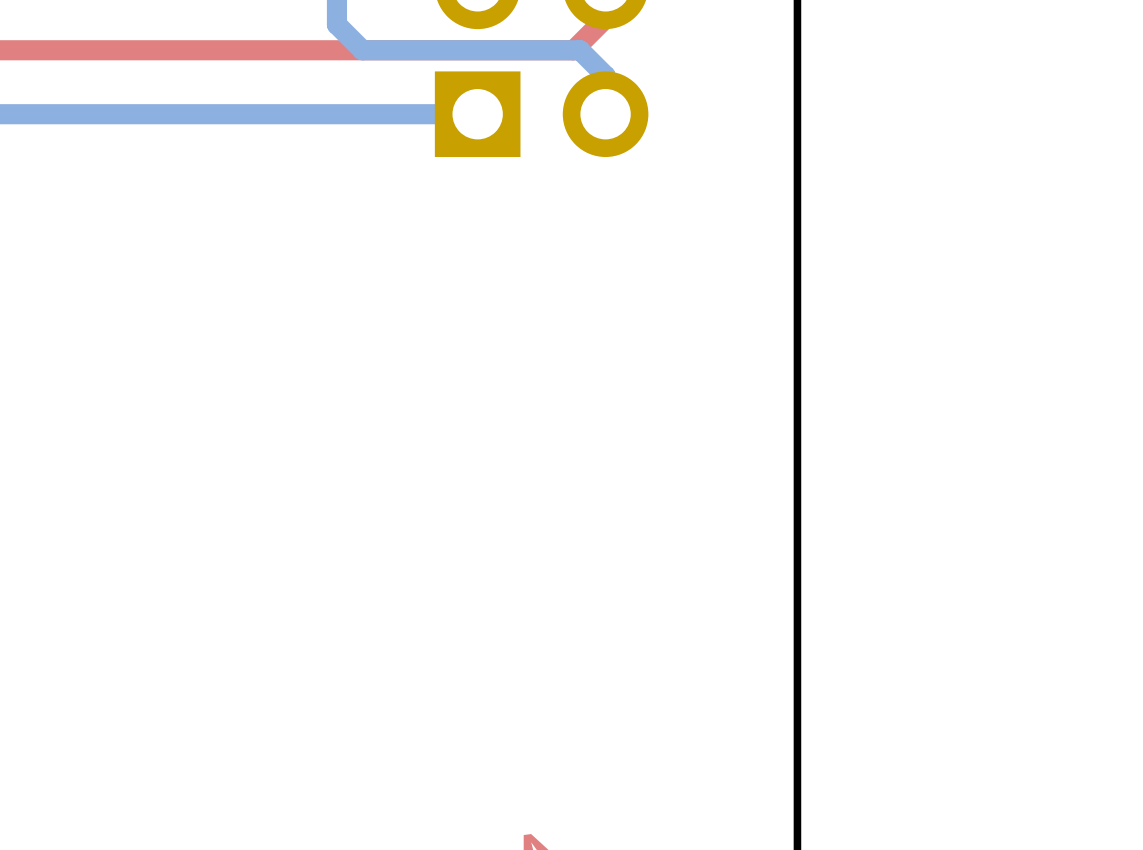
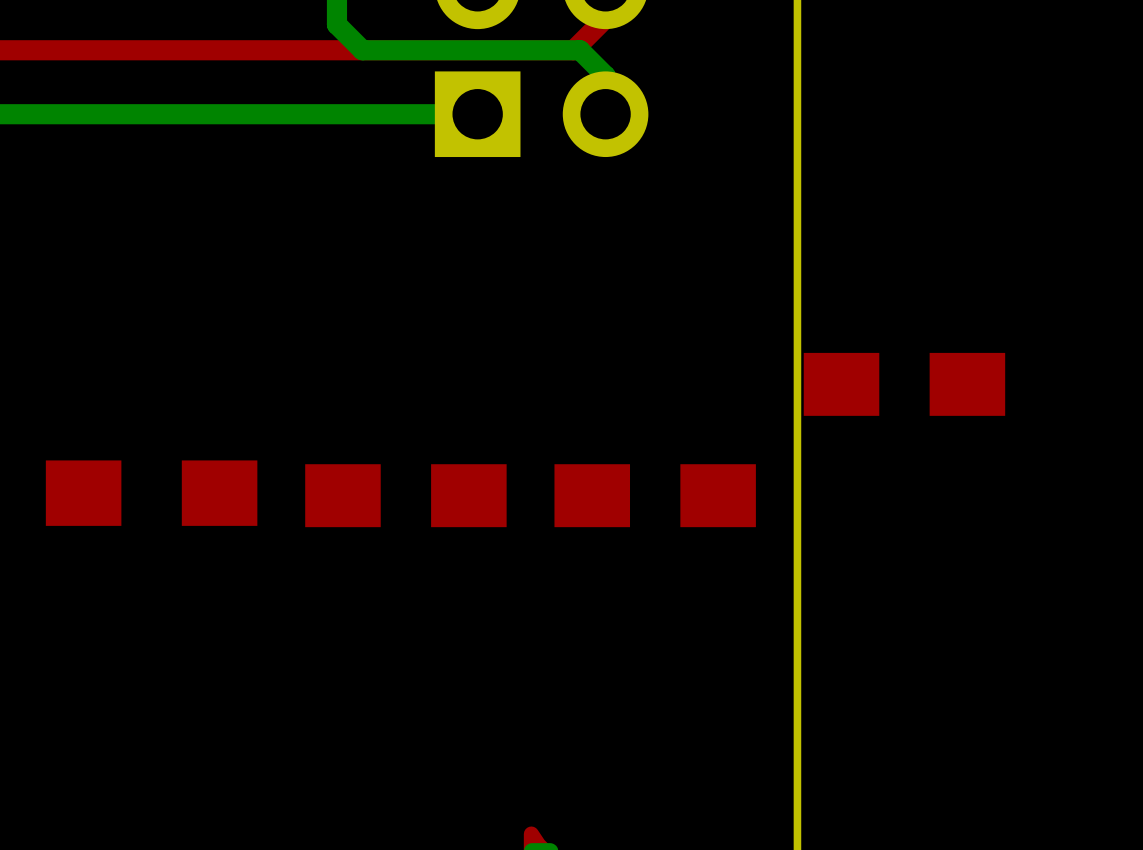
part: none -> (904, 384)
part: none -> (151, 493)
part: none -> (405, 495)
part: none -> (655, 495)

